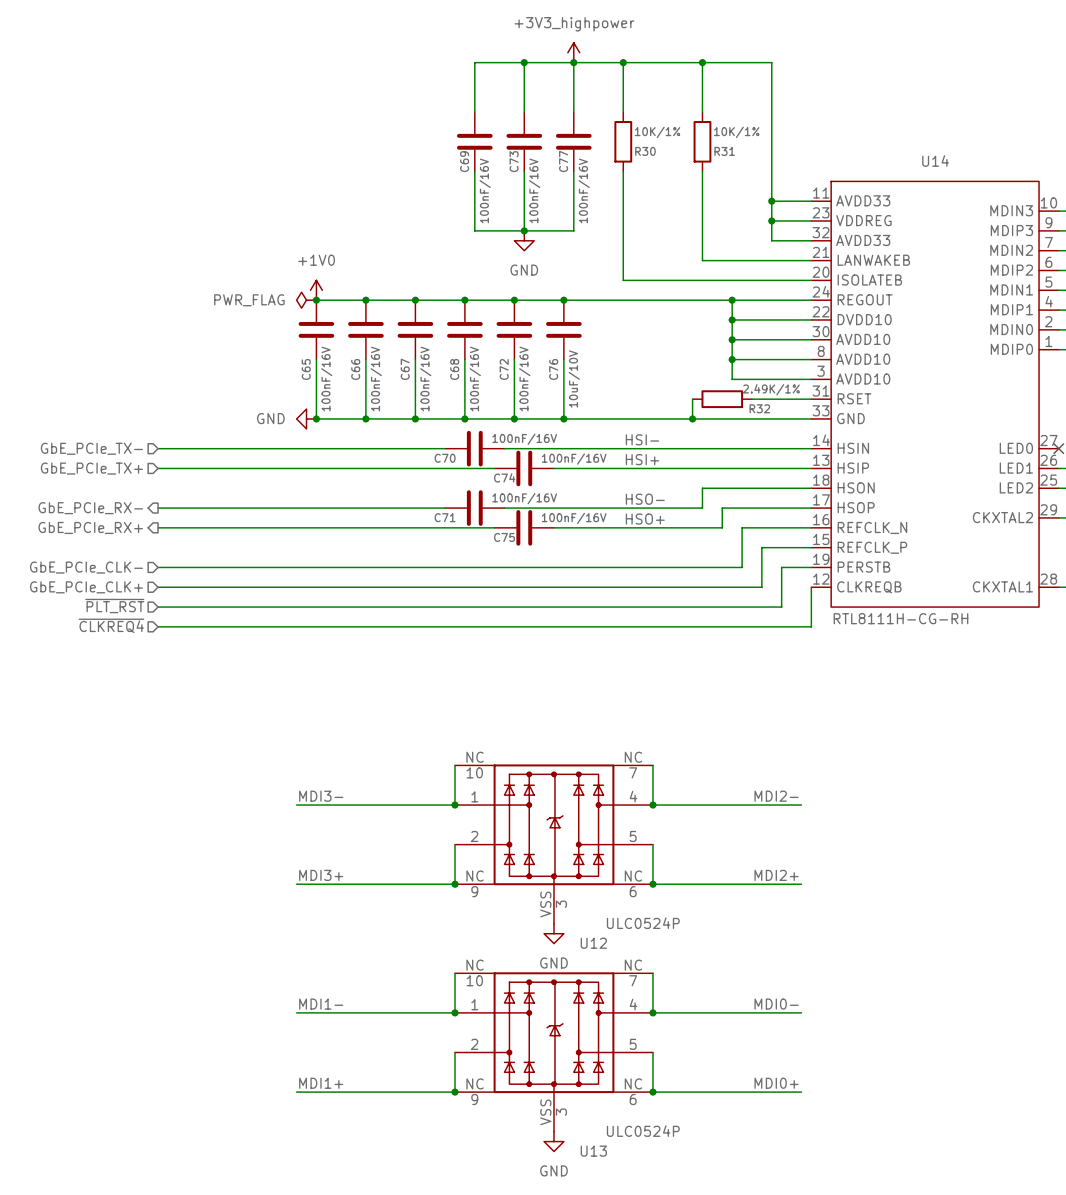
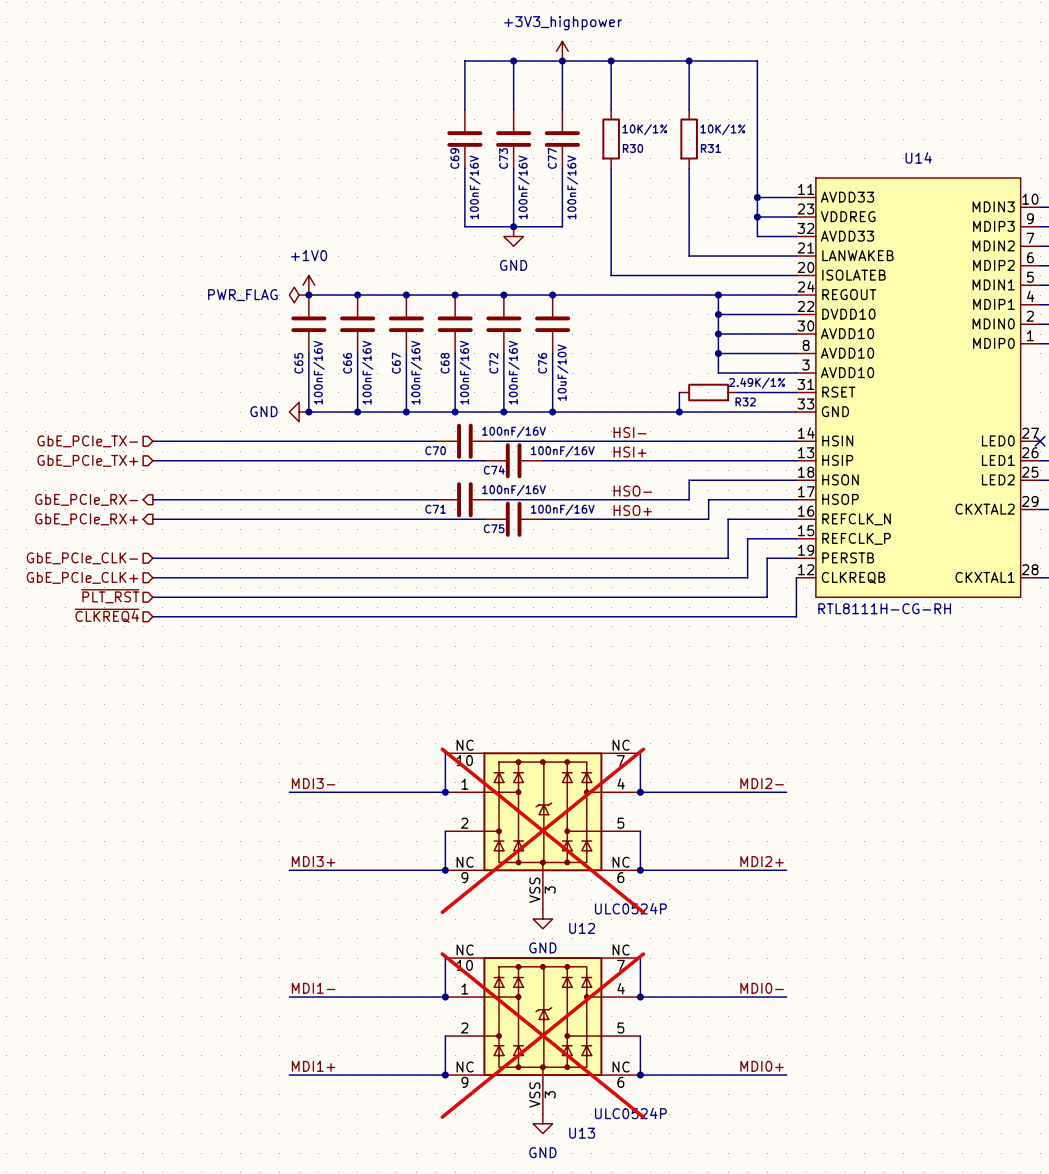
U12 do-not-place cross: none -> (542, 830)
U13 do-not-place cross: none -> (542, 1035)

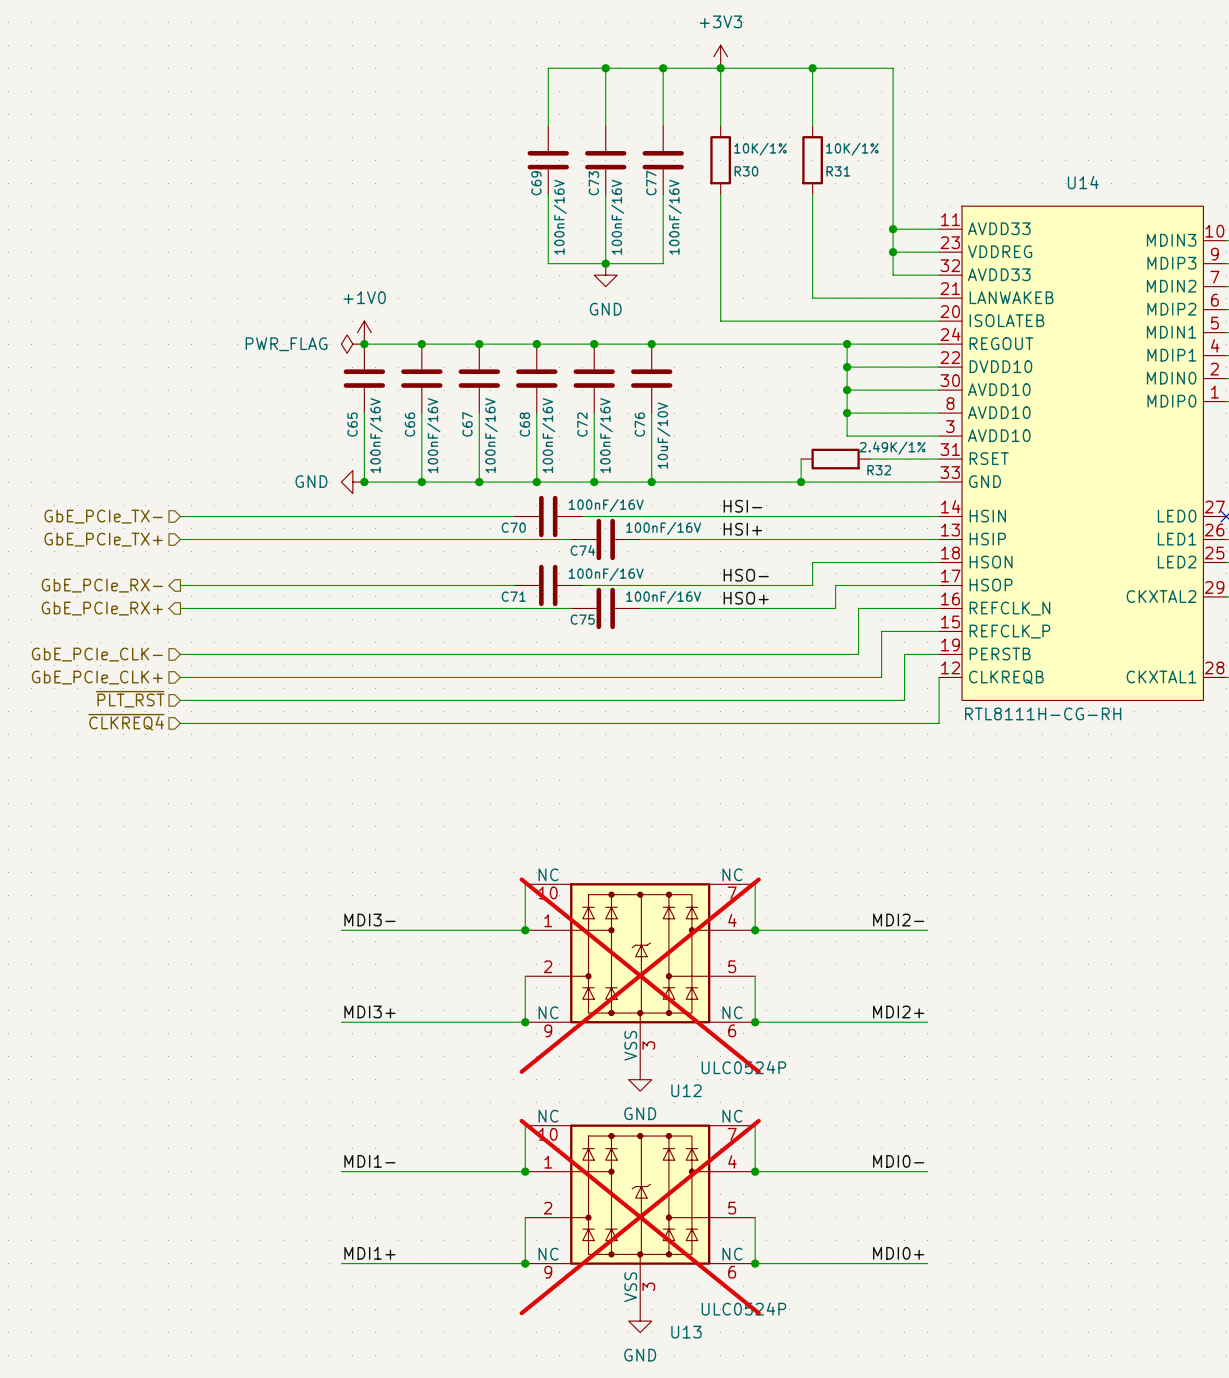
power symbol: +3V3_highpower (562, 51) -> none
power symbol: none -> +3V3 (720, 56)

